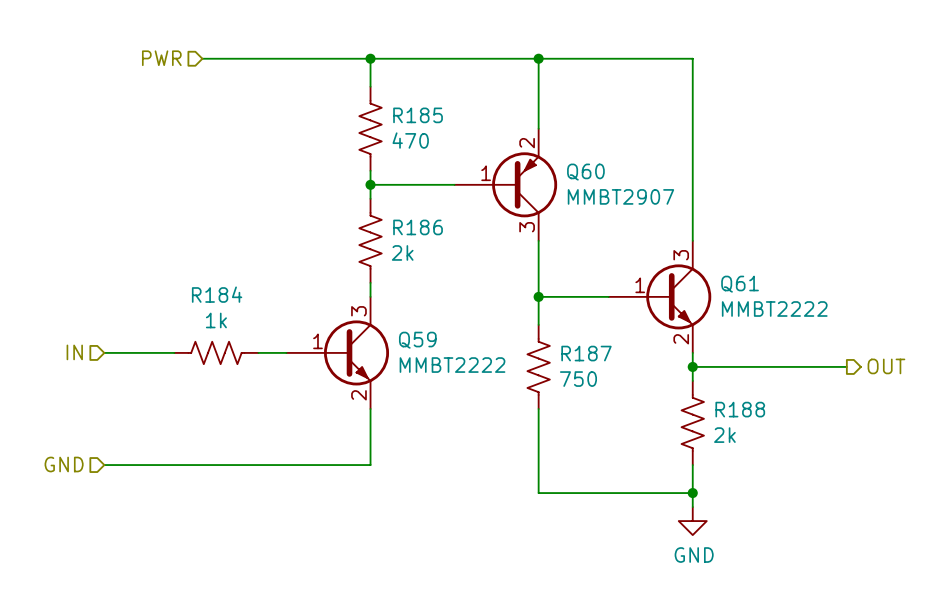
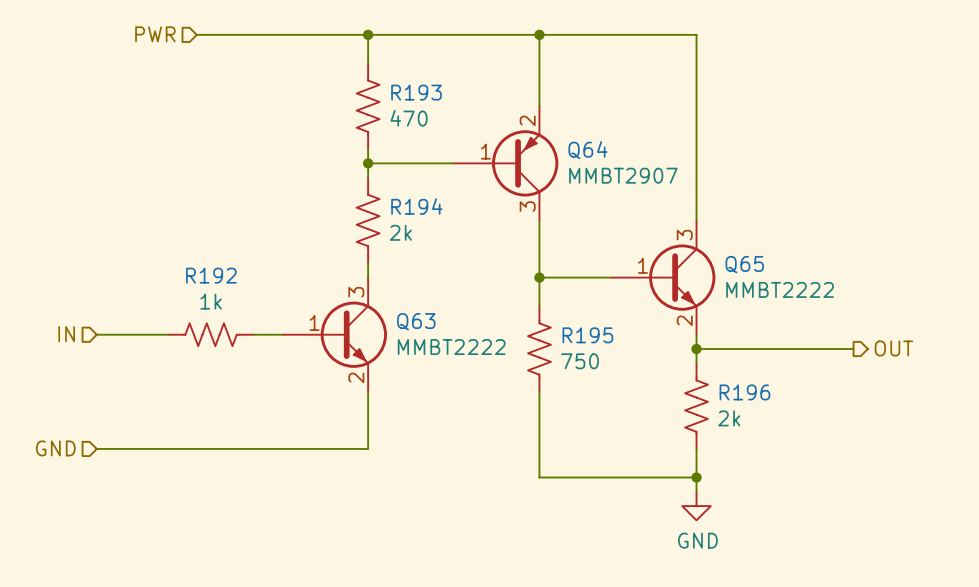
R185 name: R185 (418, 115) -> R193 (416, 92)
Q60 name: Q60 (585, 172) -> Q64 (587, 150)
R186 name: R186 (418, 227) -> R194 (416, 206)
Q61 name: Q61 (740, 284) -> Q65 (744, 264)
R184 name: R184 (217, 294) -> R192 (211, 275)
Q59 name: Q59 (417, 340) -> Q63 (416, 321)
R187 name: R187 (586, 353) -> R195 (587, 335)
R188 name: R188 (740, 409) -> R196 (744, 392)

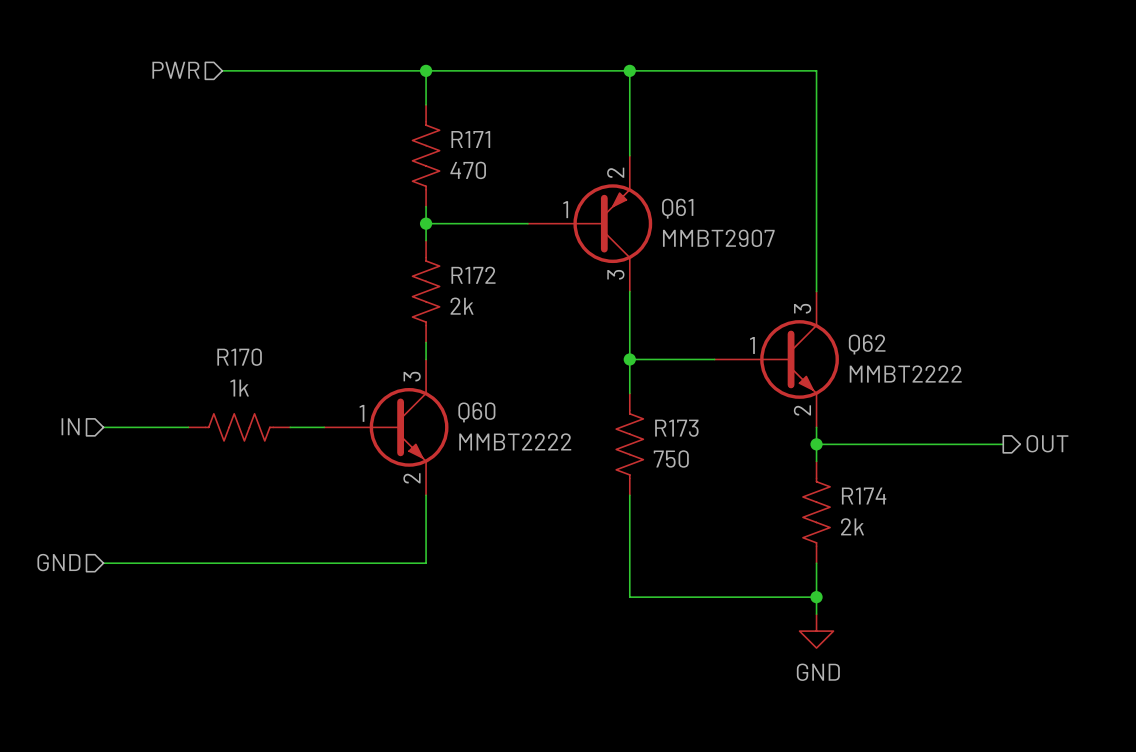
R193 name: R193 (416, 92) -> R171 (470, 139)
Q64 name: Q64 (587, 150) -> Q61 (677, 208)
R194 name: R194 (416, 206) -> R172 (473, 275)
Q65 name: Q65 (744, 264) -> Q62 (867, 344)
R192 name: R192 (211, 275) -> R170 (239, 357)
Q63 name: Q63 (416, 321) -> Q60 (476, 412)
R195 name: R195 (587, 335) -> R173 (676, 428)
R196 name: R196 (744, 392) -> R174 (864, 496)

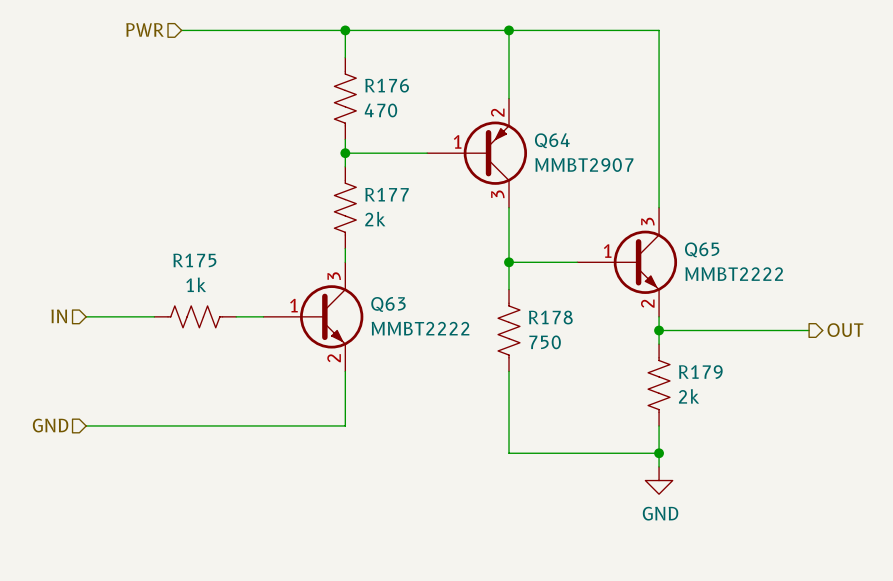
R171 name: R171 (470, 139) -> R176 (387, 85)
Q61 name: Q61 (677, 208) -> Q64 (552, 140)
R172 name: R172 (473, 275) -> R177 (387, 194)
Q62 name: Q62 (867, 344) -> Q65 (702, 249)
R170 name: R170 (239, 357) -> R175 (194, 260)
Q60 name: Q60 (476, 412) -> Q63 (388, 304)
R173 name: R173 (676, 428) -> R178 (550, 317)
R174 name: R174 (864, 496) -> R179 (700, 372)

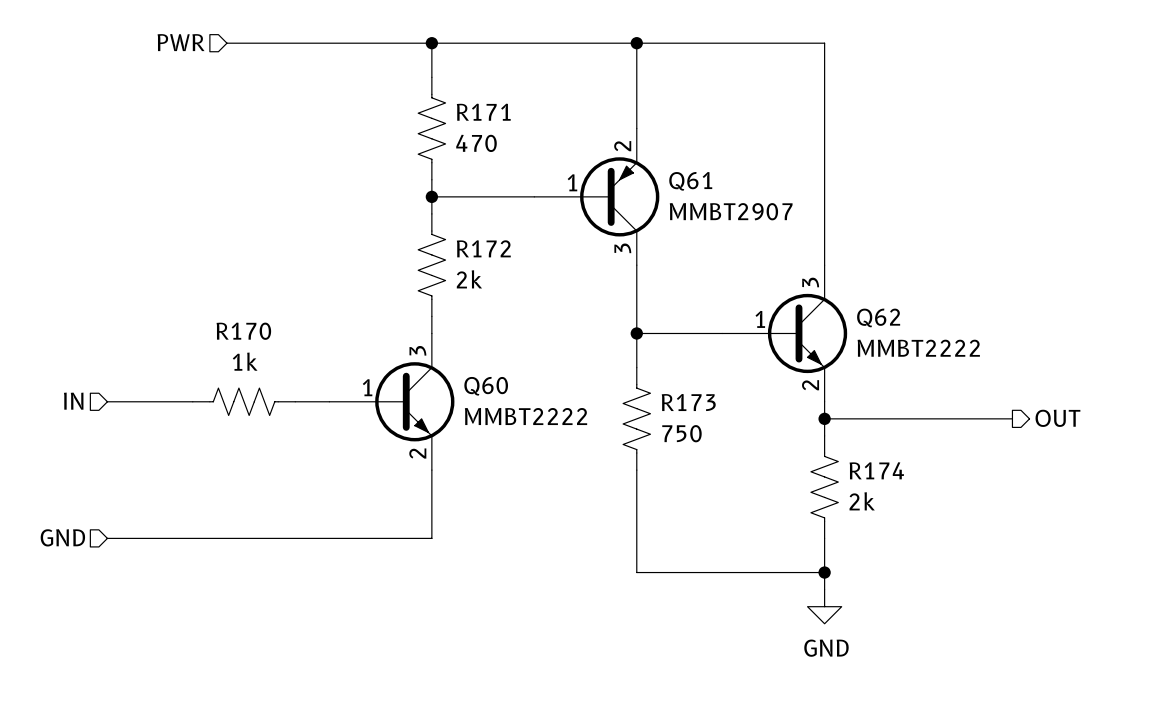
R176 name: R176 (387, 85) -> R171 (483, 112)
Q64 name: Q64 (552, 140) -> Q61 (690, 181)
R177 name: R177 (387, 194) -> R172 (483, 248)
Q65 name: Q65 (702, 249) -> Q62 (878, 317)
R175 name: R175 (194, 260) -> R170 (243, 331)
Q63 name: Q63 (388, 304) -> Q60 (486, 386)
R178 name: R178 (550, 317) -> R173 (688, 402)
R179 name: R179 (700, 372) -> R174 (876, 470)

